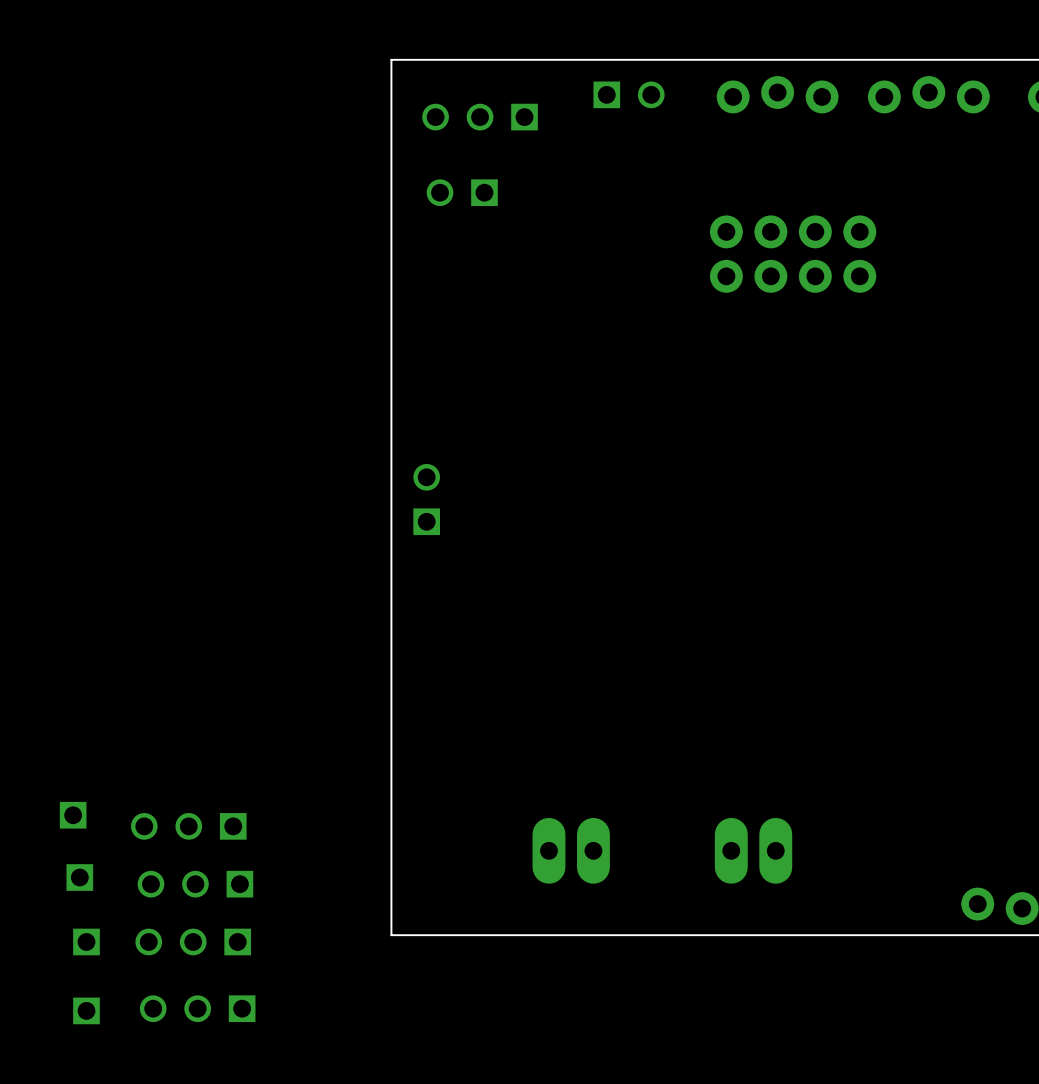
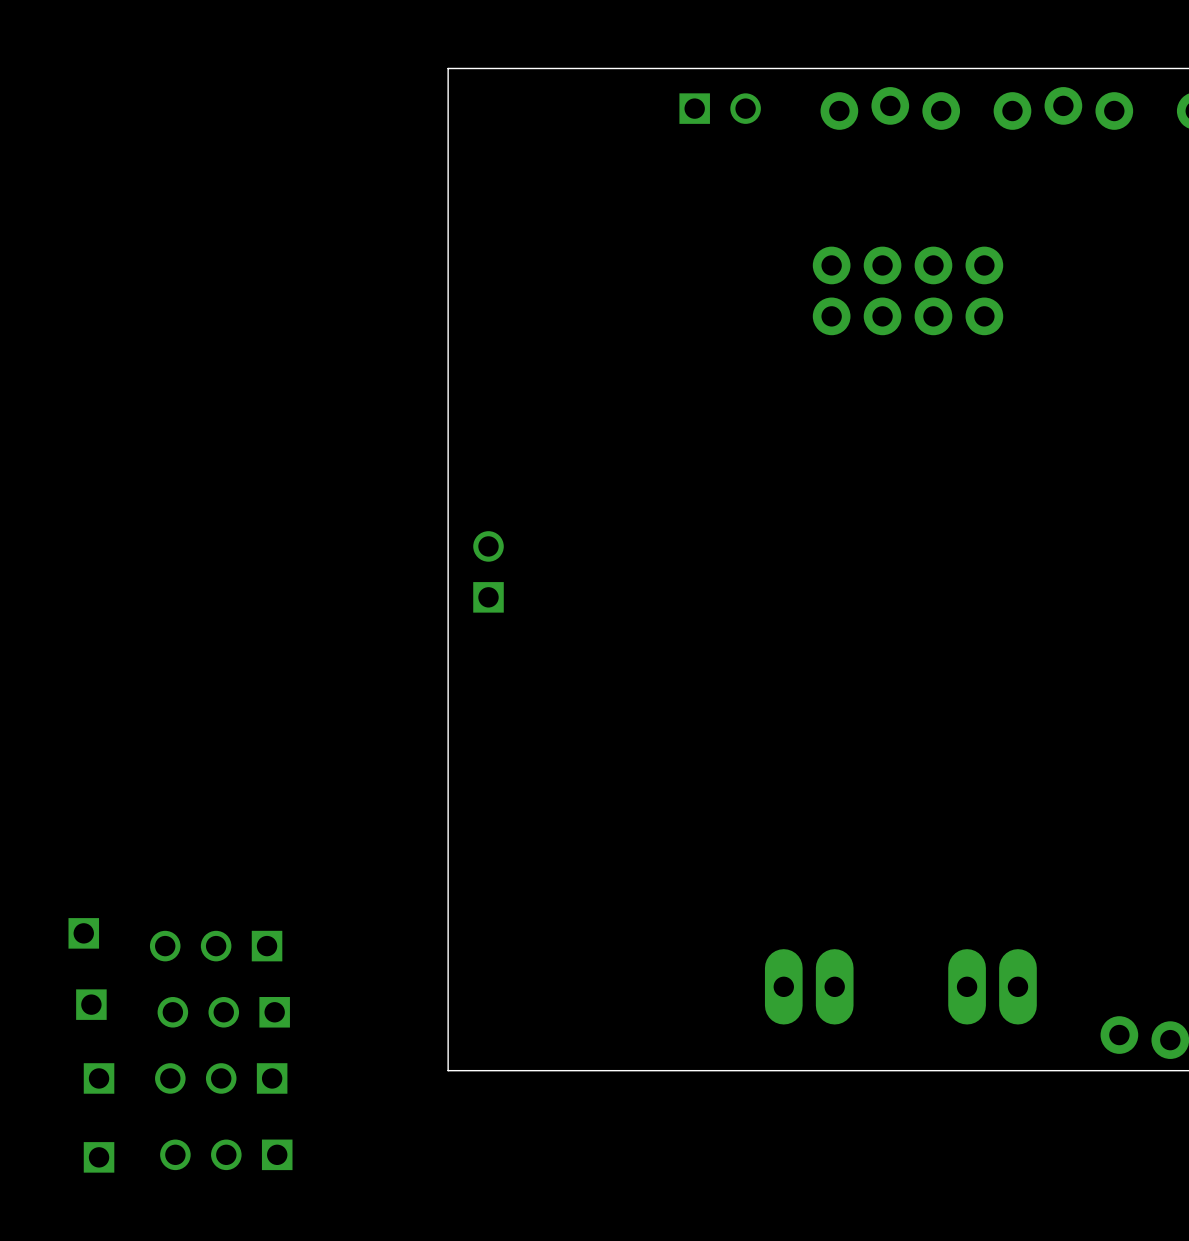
part: (480, 117) -> none
part: (462, 192) -> none
part: (571, 850) -> none
part position: (753, 850) -> (809, 986)
part: none -> (992, 986)

